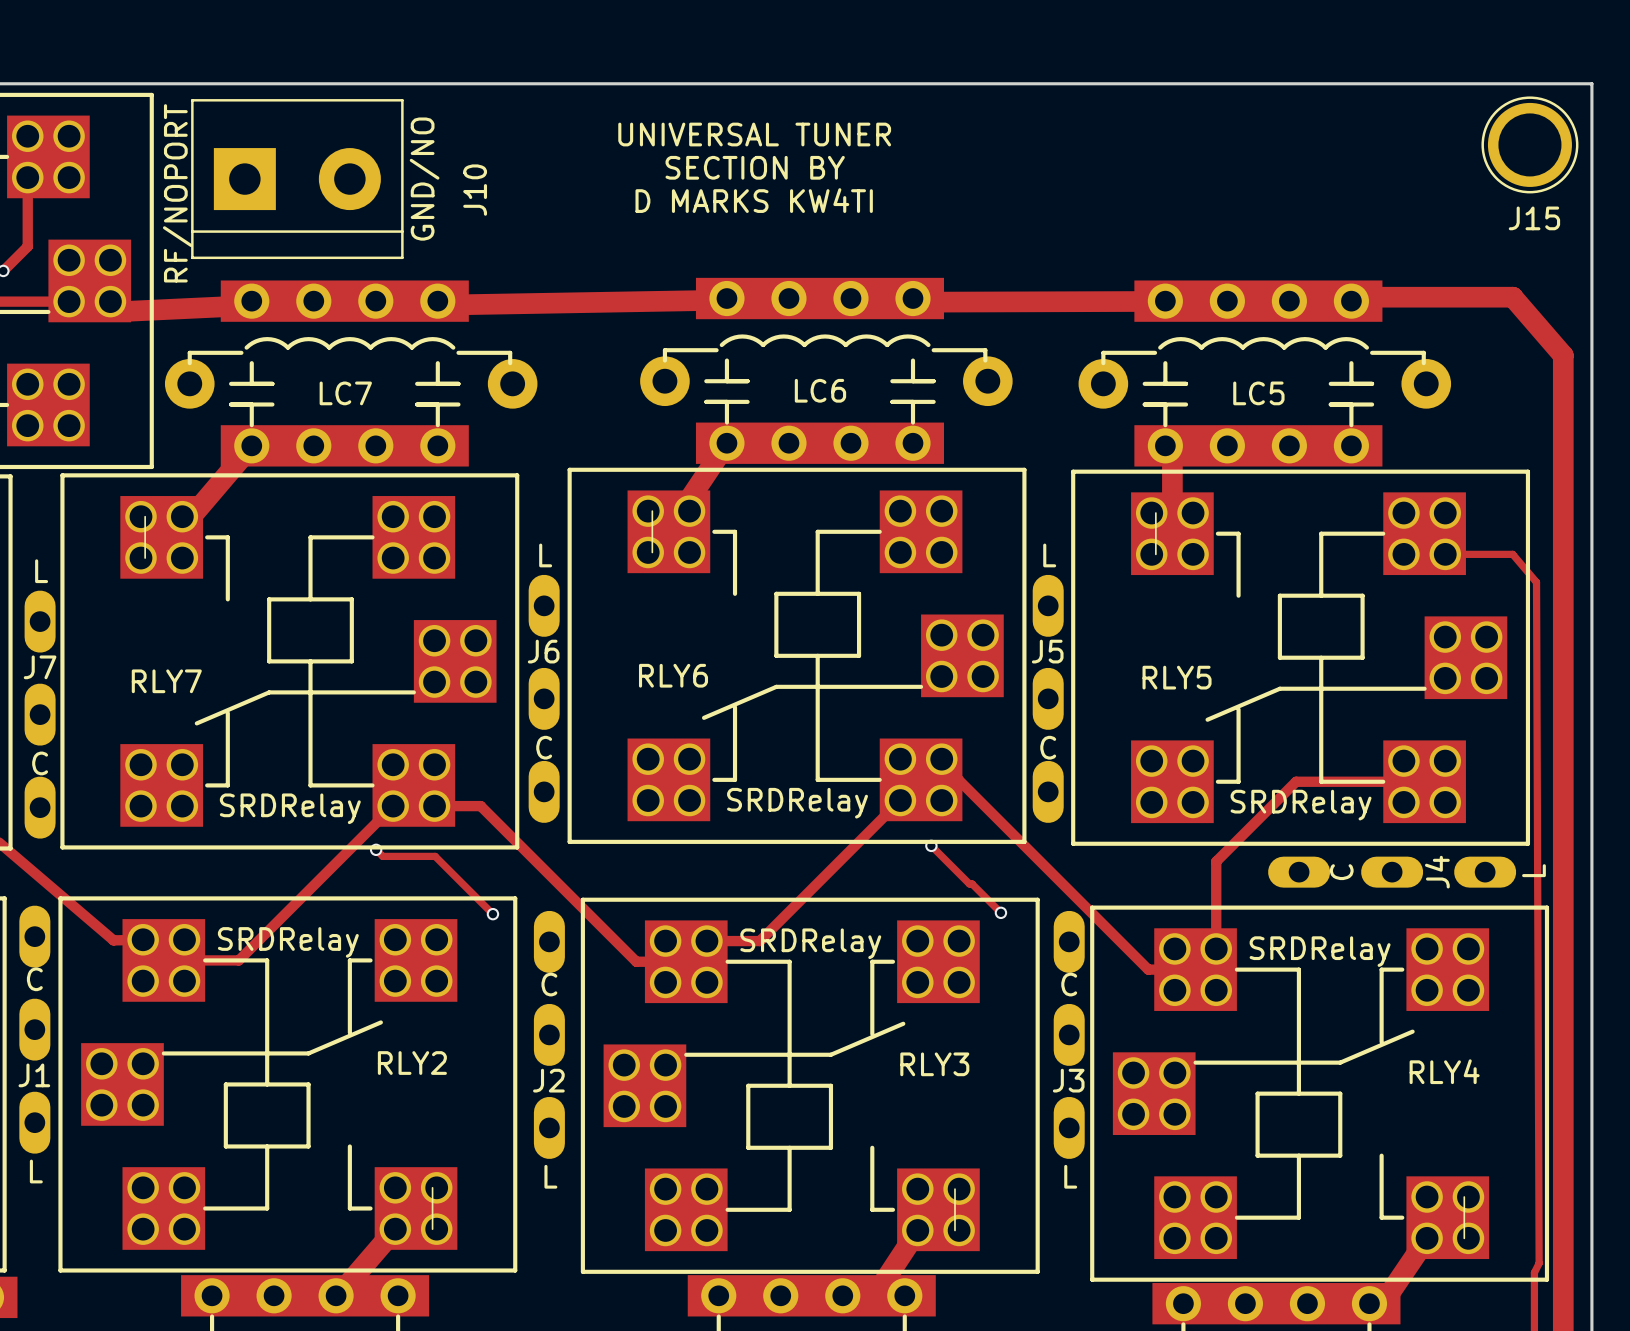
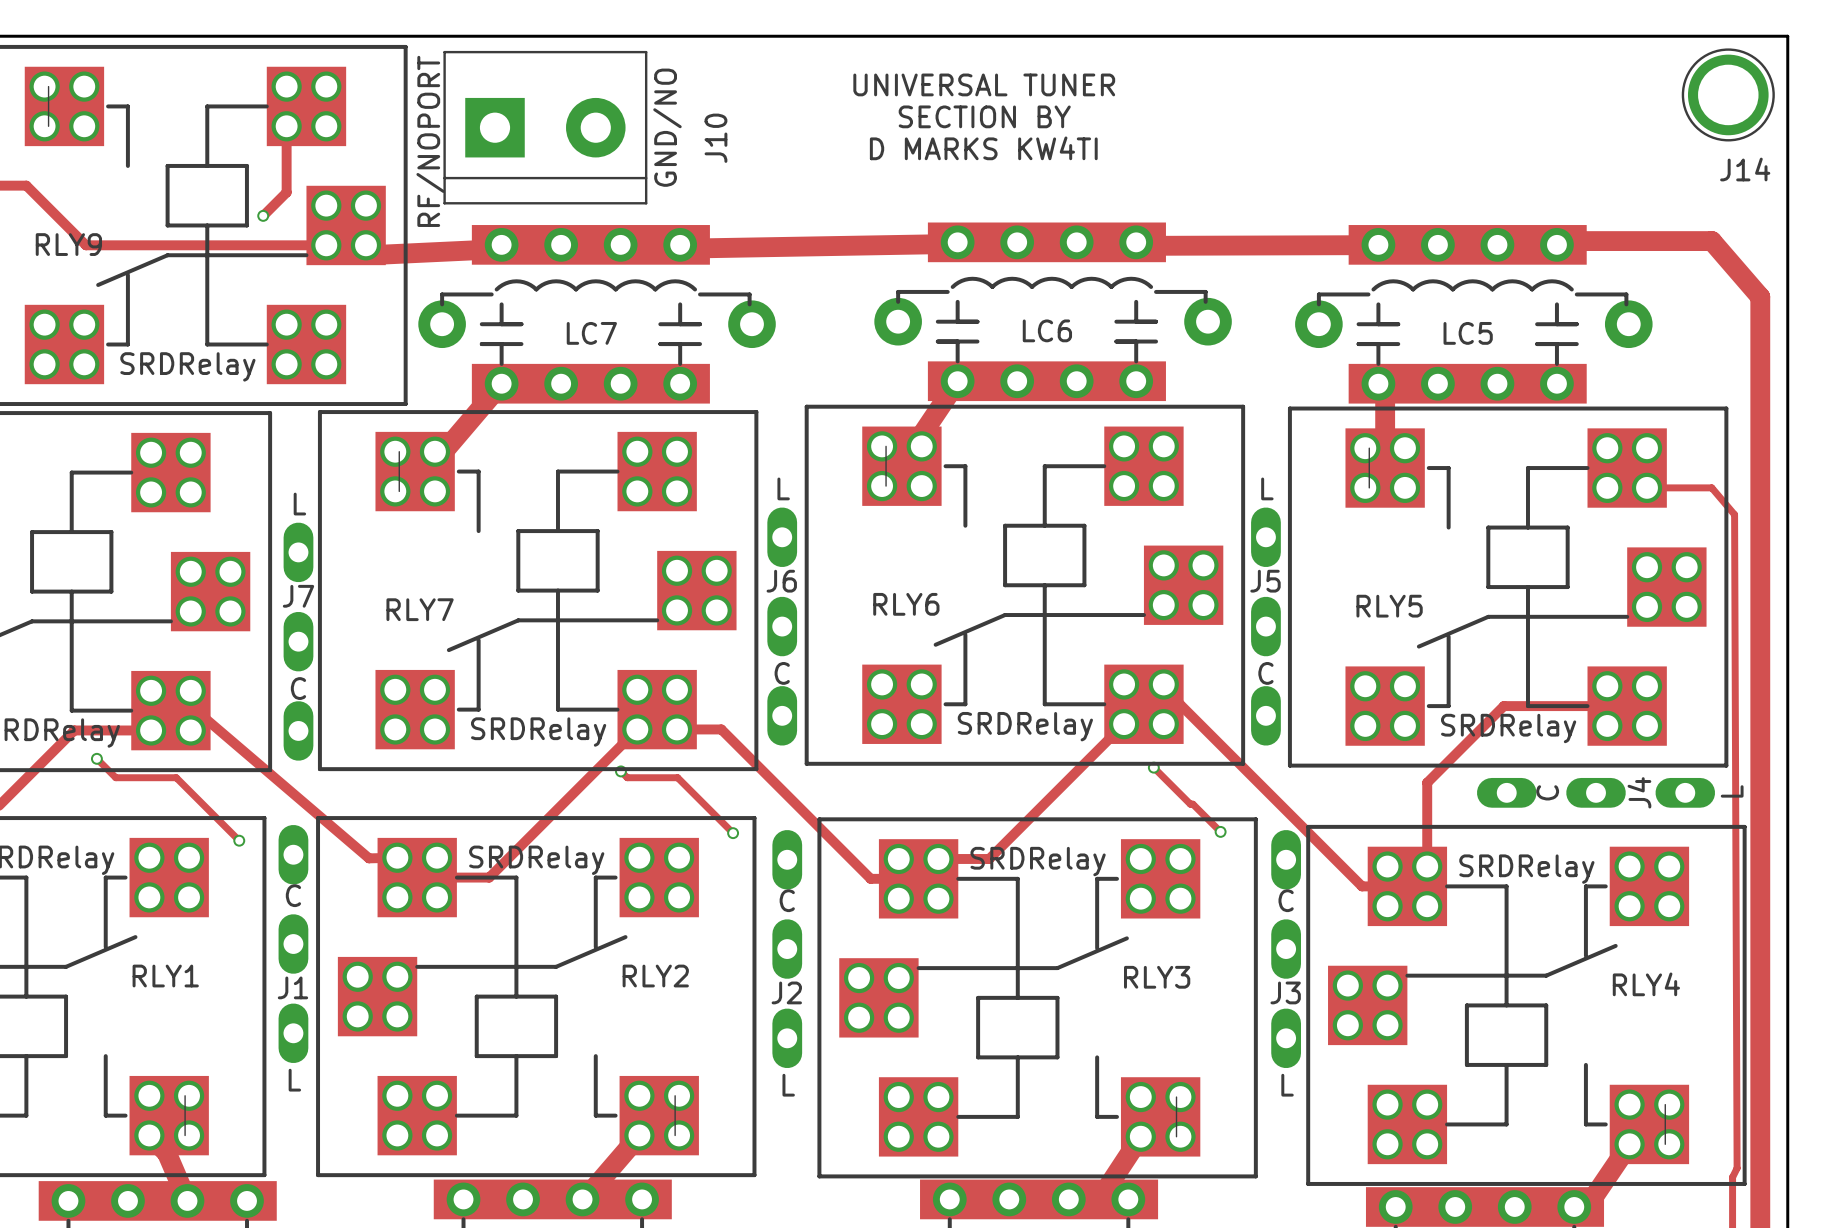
J15 name: J15 (1534, 218) -> J14 (1745, 169)

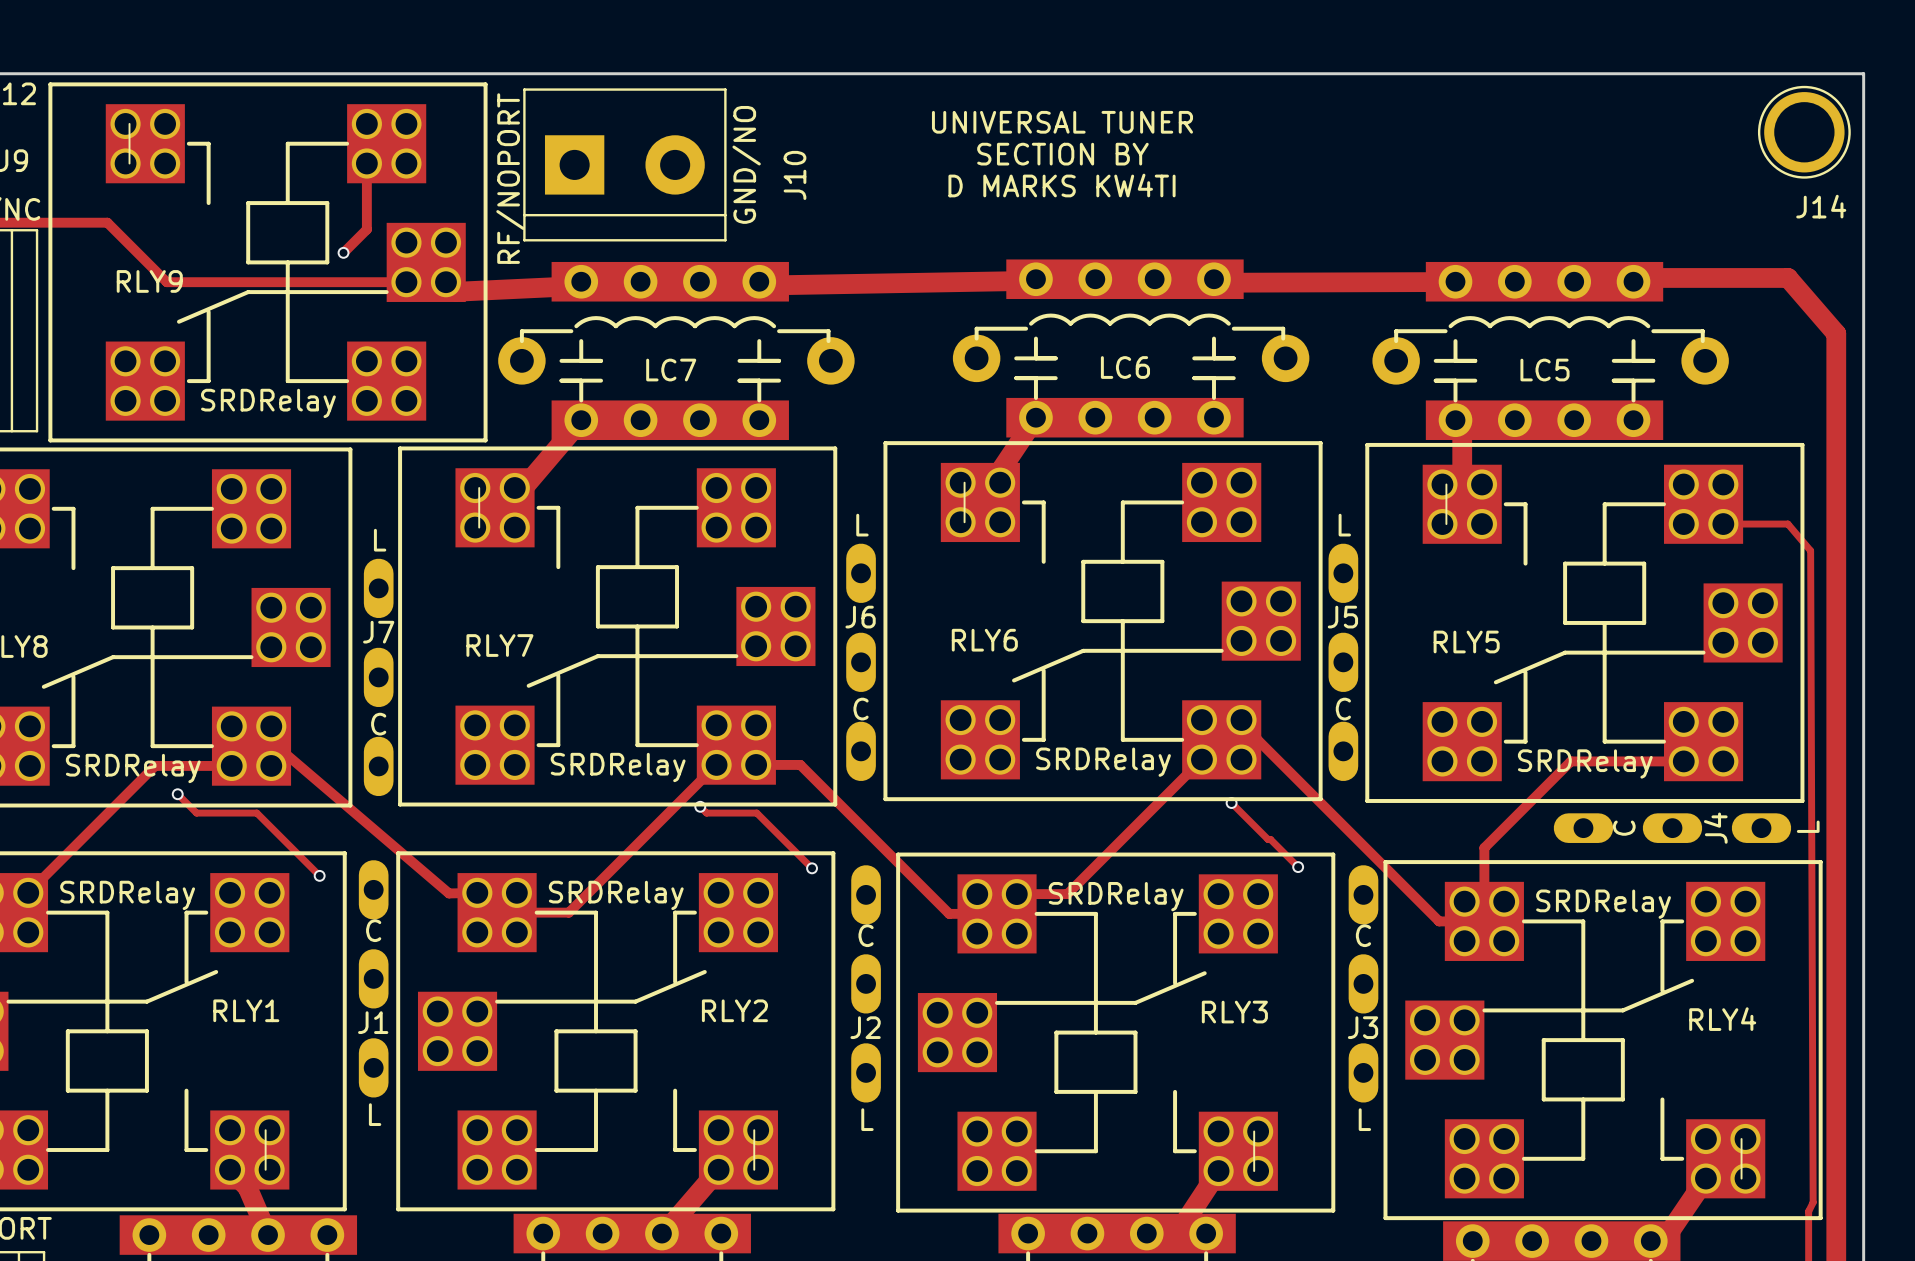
track: (1627, 706) (1503, 706) (1427, 782) (1427, 866) -> none
track: none -> (1683, 761) (1570, 761) (1484, 847) (1484, 921)

